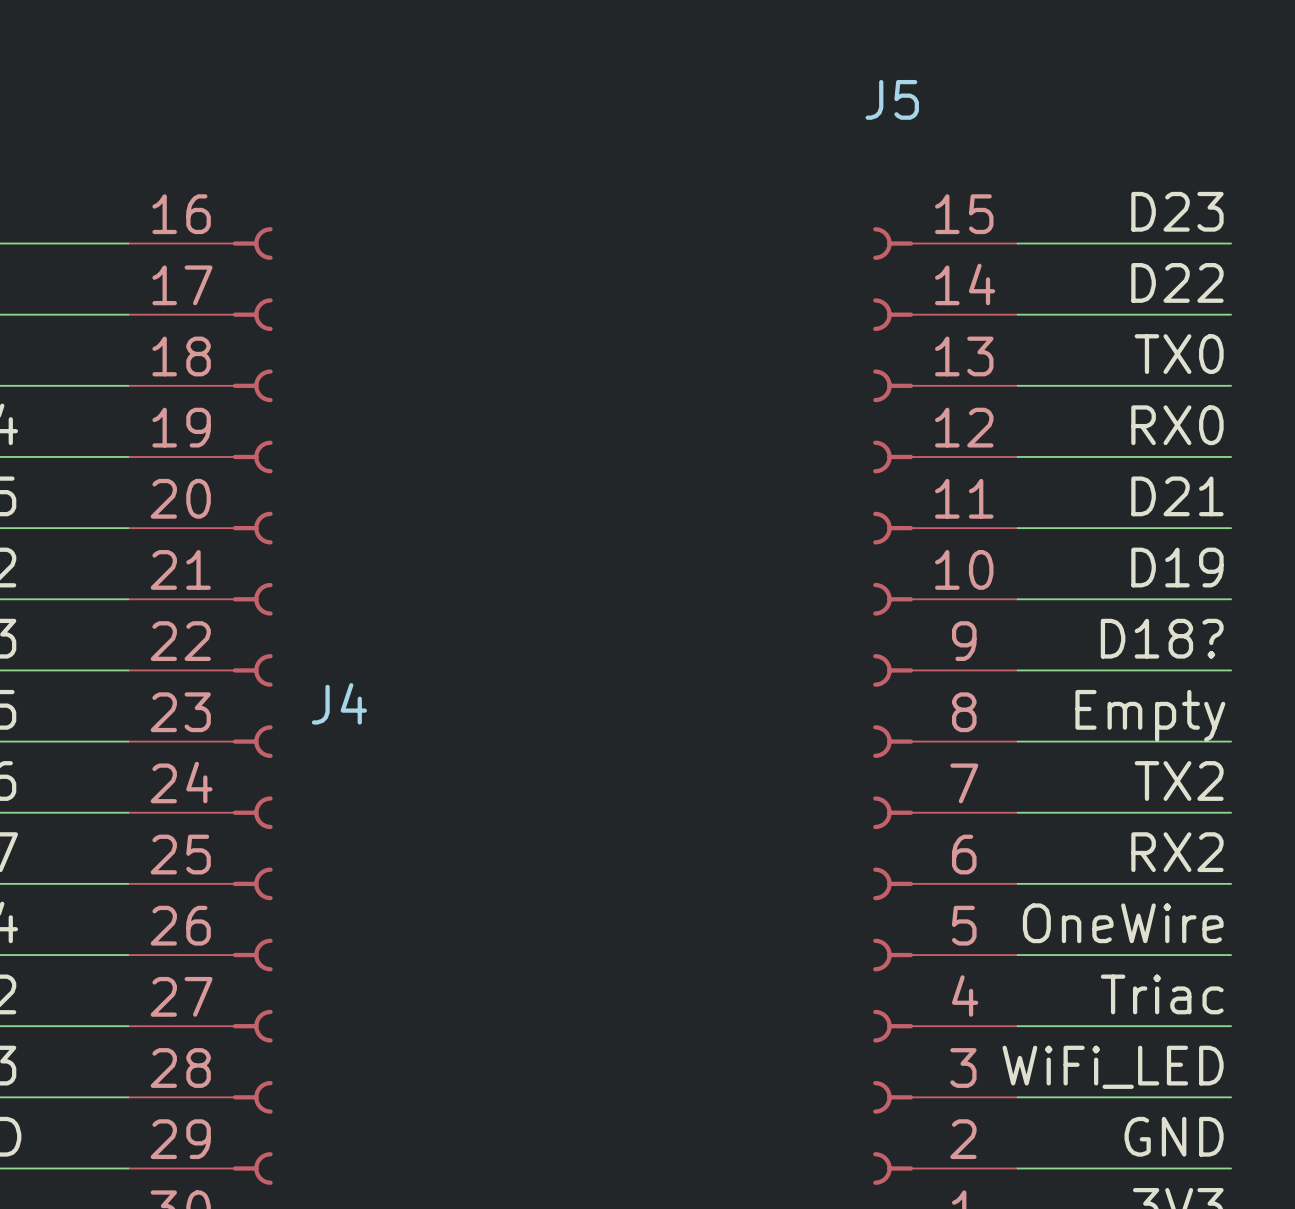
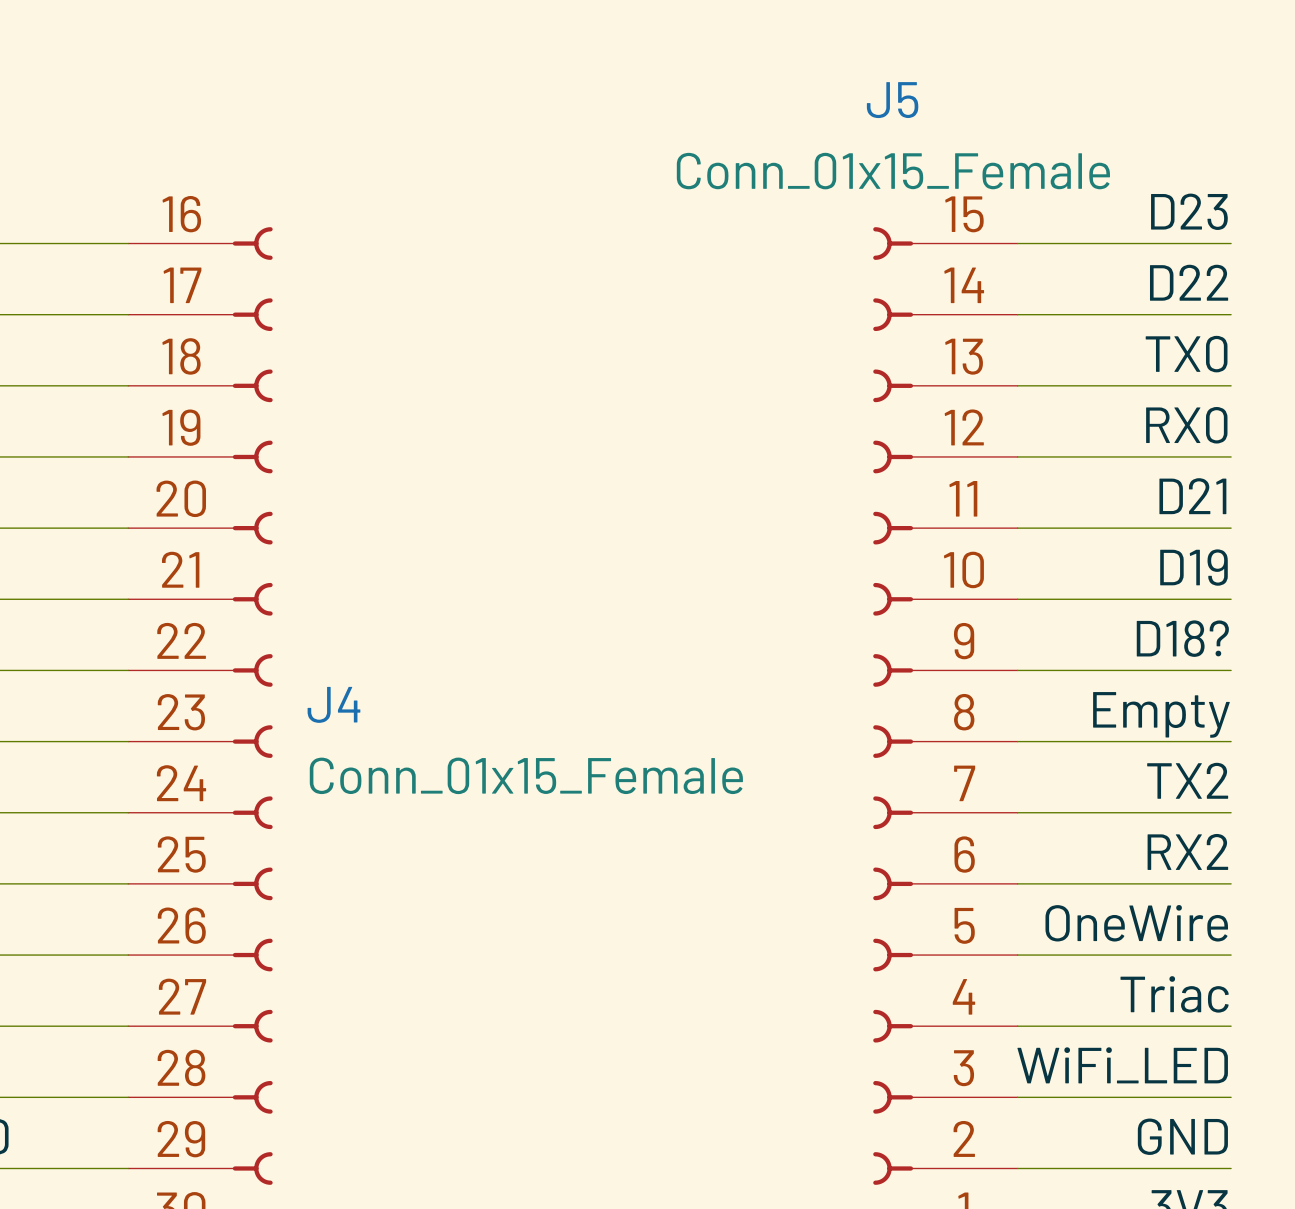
J5 value: none -> Conn_01x15_Female (893, 171)
J4 value: none -> Conn_01x15_Female (526, 775)

